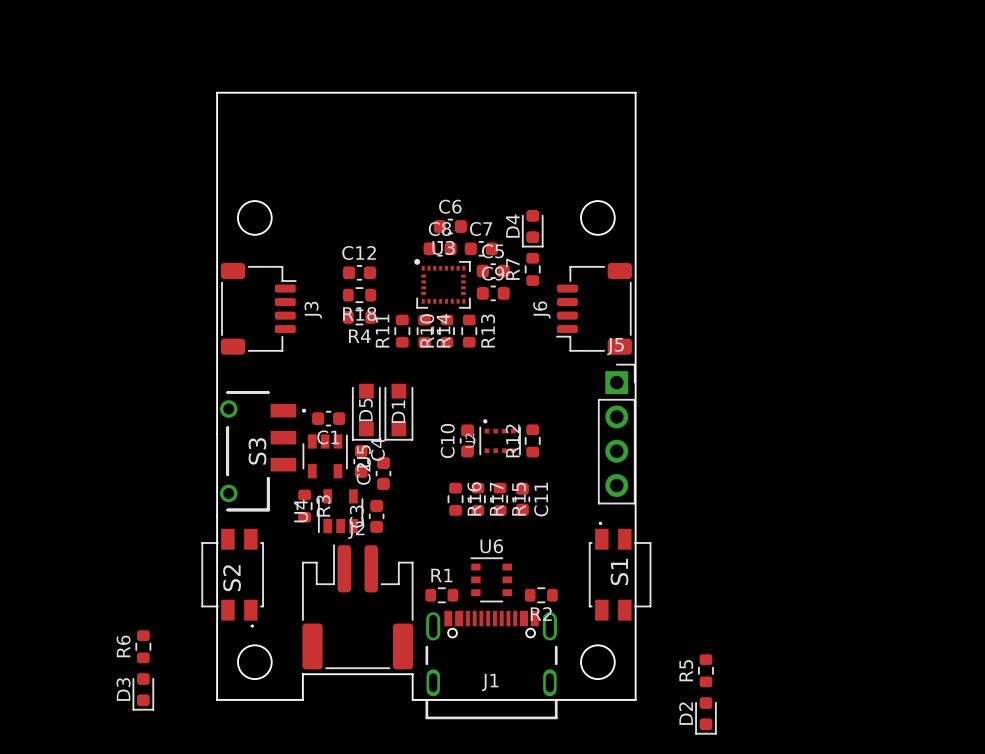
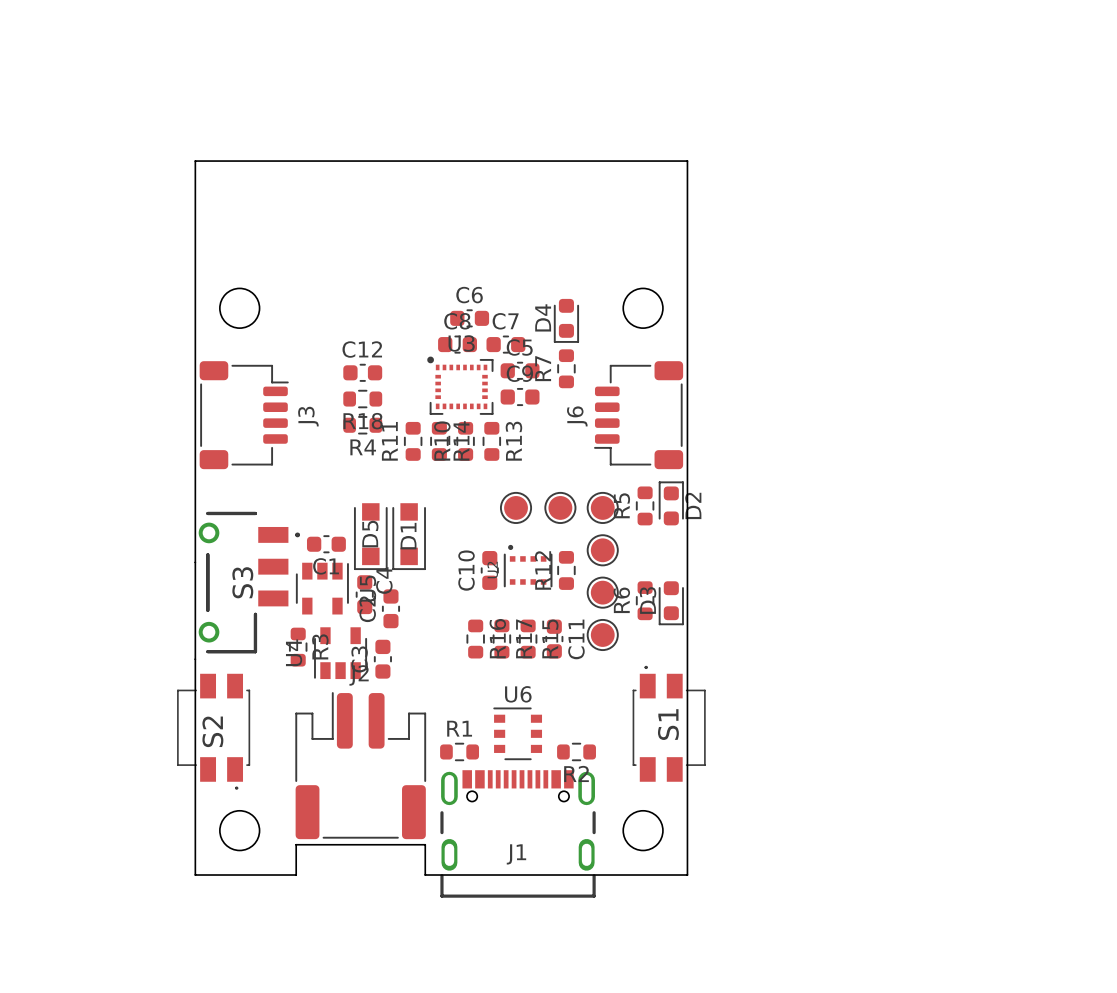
part: none -> (516, 507)
part: none -> (560, 507)
part: none -> (602, 507)
part: none -> (602, 550)
J5: (616, 434) -> none
part: none -> (602, 592)
part: none -> (602, 635)
R6 position: (143, 646) -> (645, 600)
R5 position: (705, 670) -> (645, 505)
D3 position: (143, 691) -> (671, 603)
D2 rotation: 0° (705, 715) -> 180° (671, 503)
D2 position: (705, 715) -> (671, 503)

